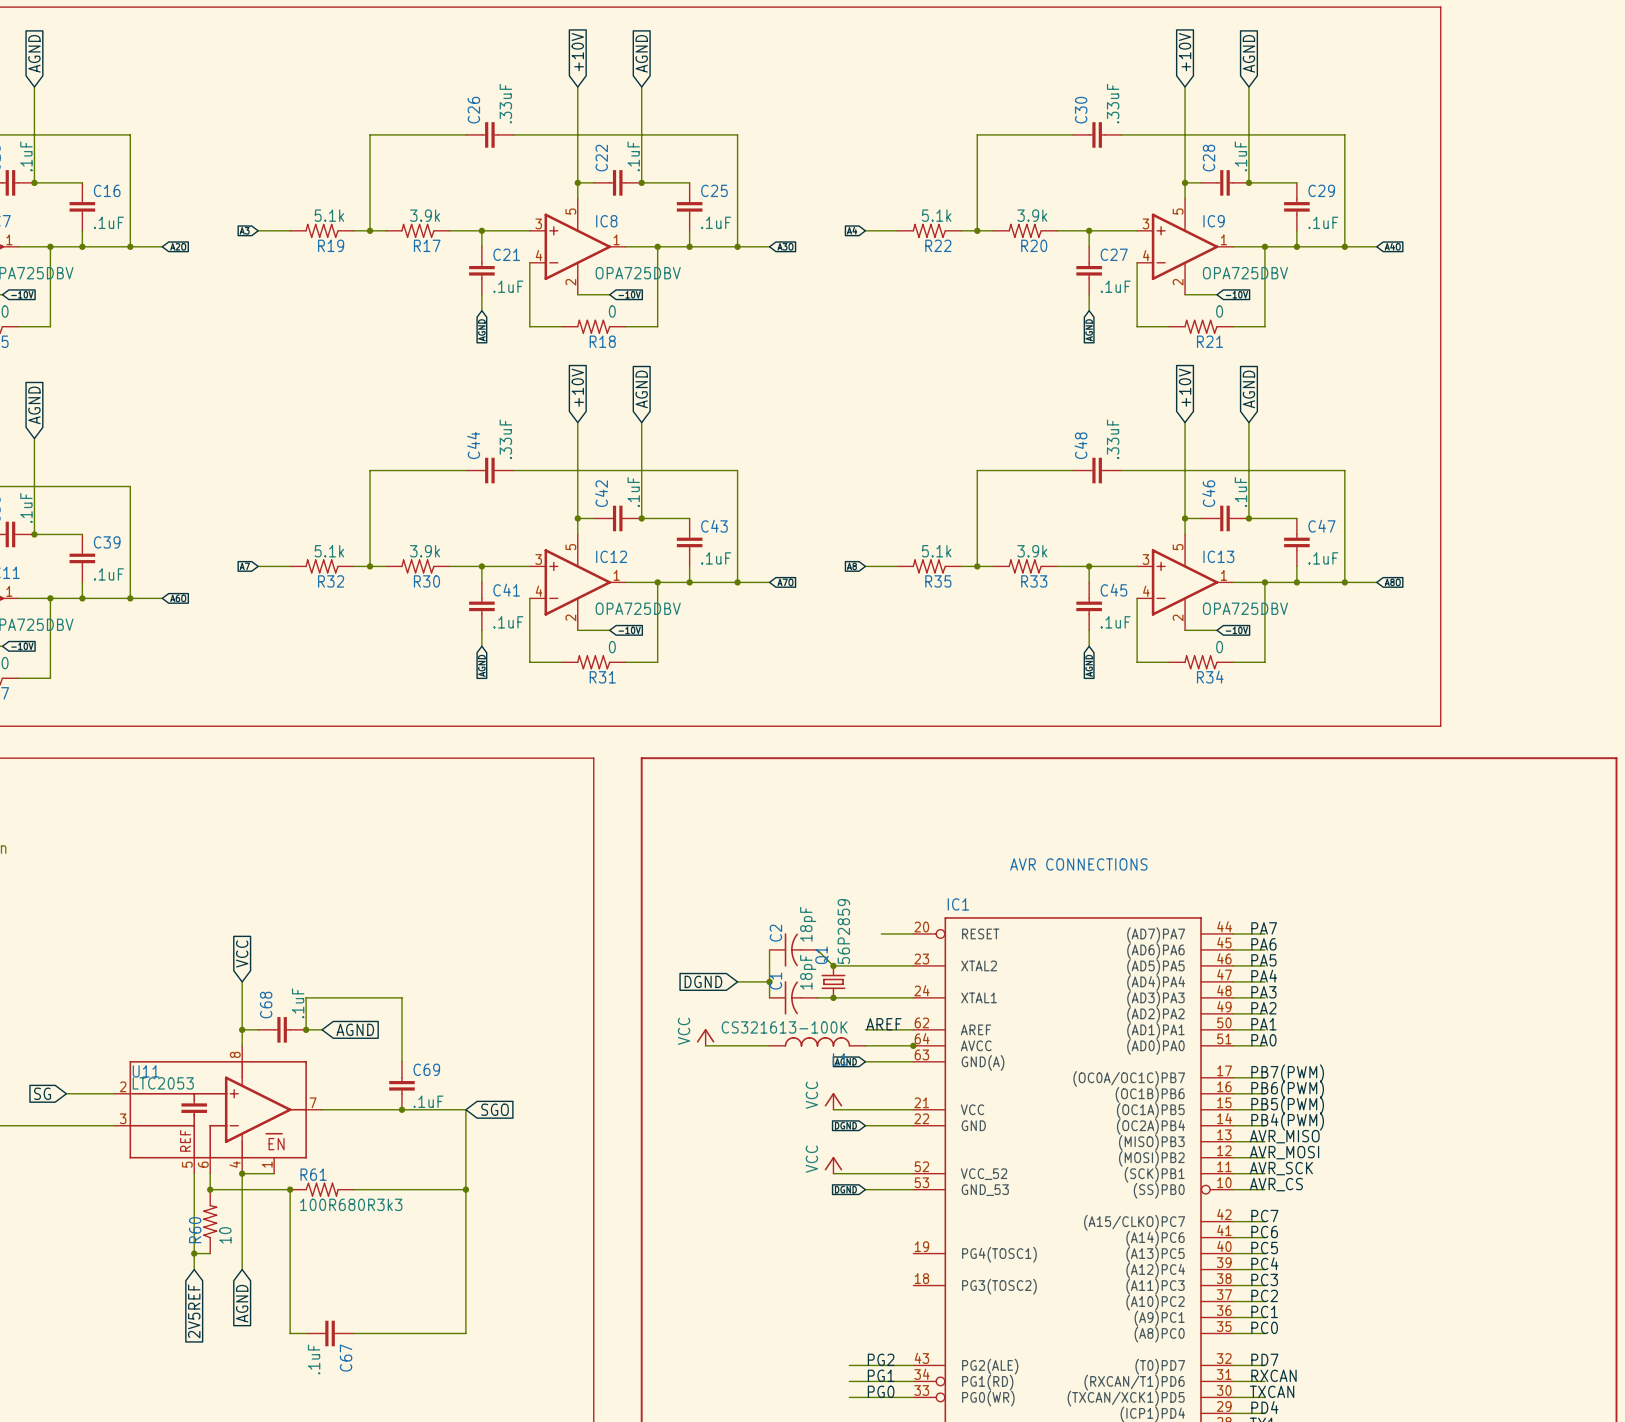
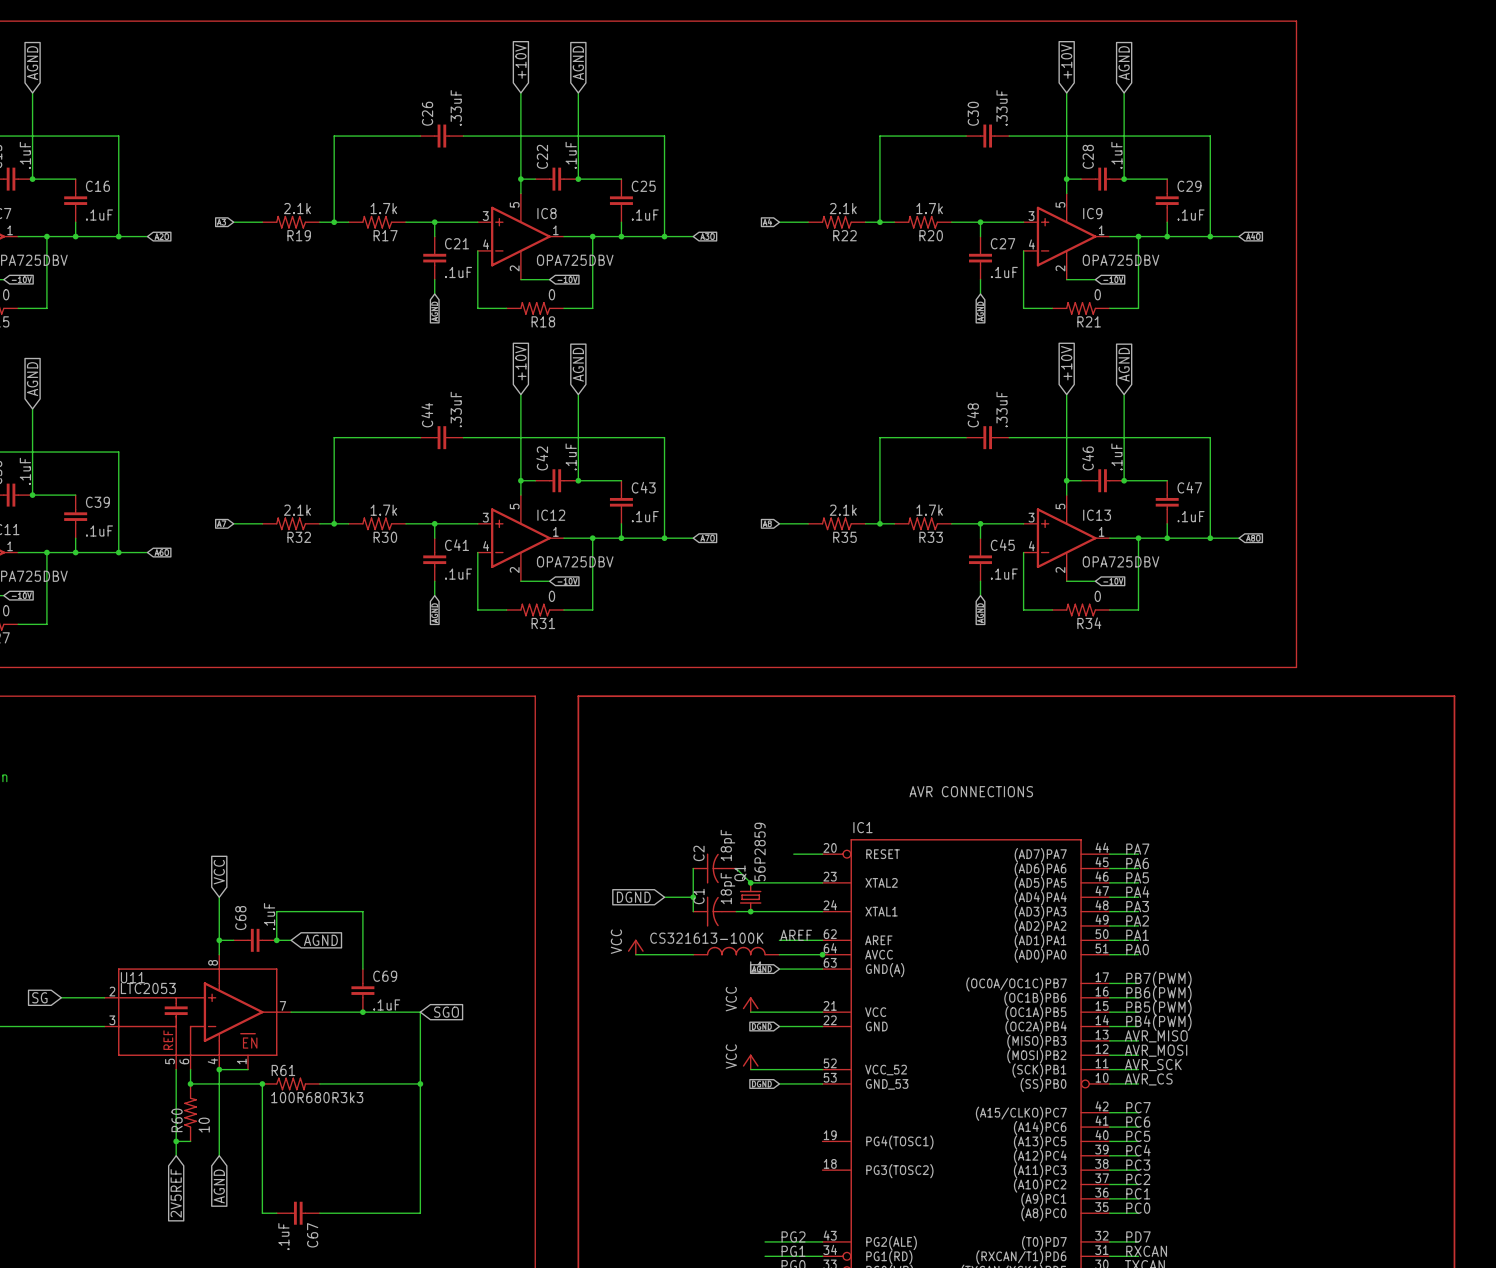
R19 value: 5.1k (329, 215) -> 2.1k (297, 208)
R17 value: 3.9k (425, 215) -> 1.7k (383, 208)
R22 value: 5.1k (936, 215) -> 2.1k (843, 208)
R20 value: 3.9k (1032, 215) -> 1.7k (929, 208)
R32 value: 5.1k (329, 551) -> 2.1k (297, 510)
R30 value: 3.9k (425, 551) -> 1.7k (383, 510)
R35 value: 5.1k (936, 551) -> 2.1k (843, 510)
R33 value: 3.9k (1032, 551) -> 1.7k (929, 510)

